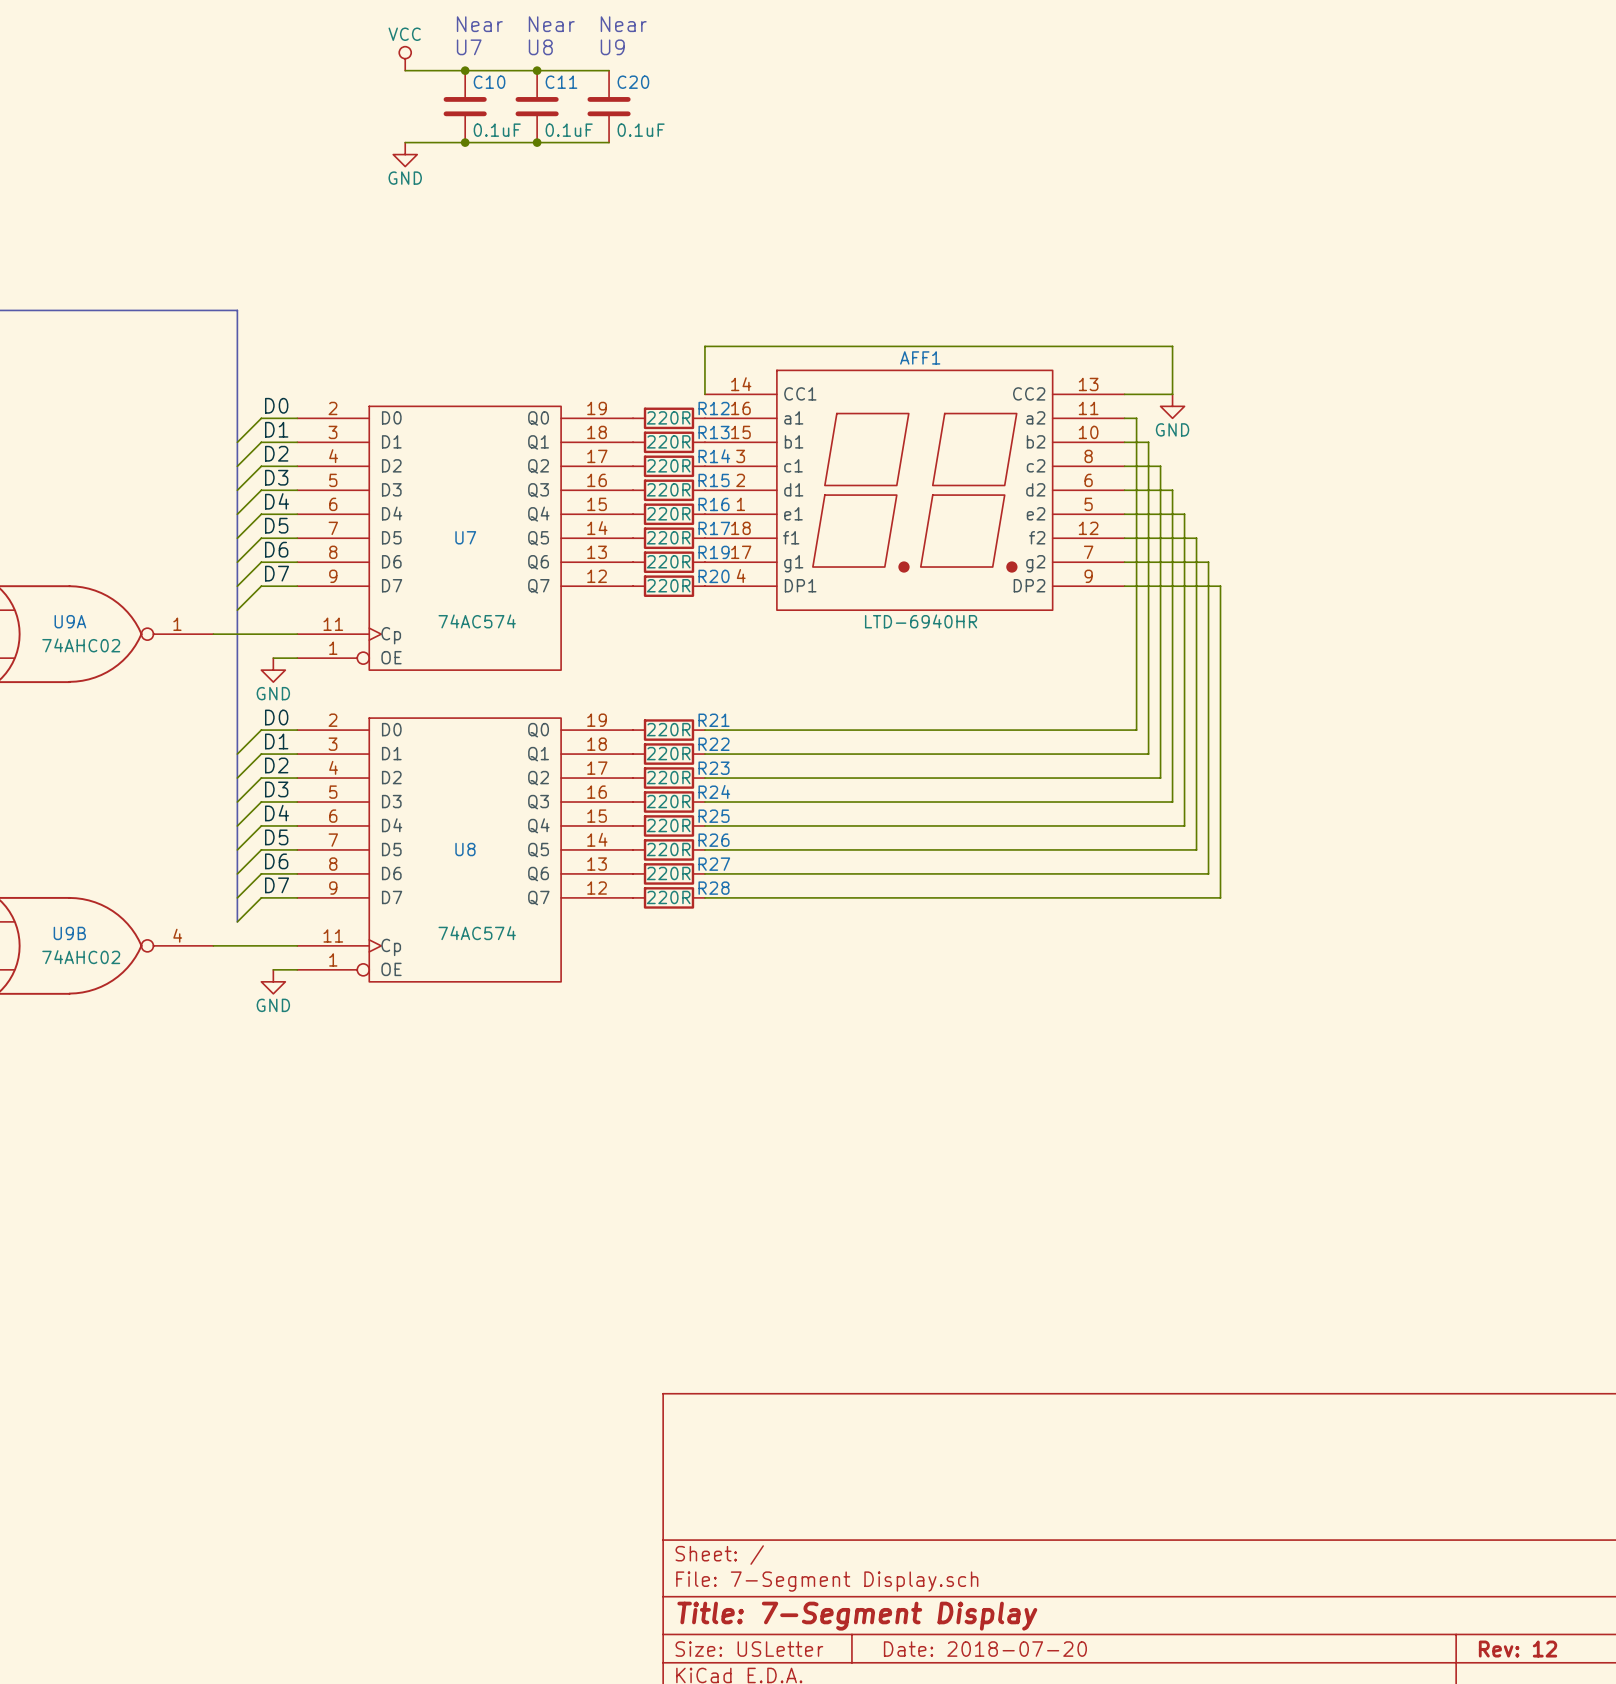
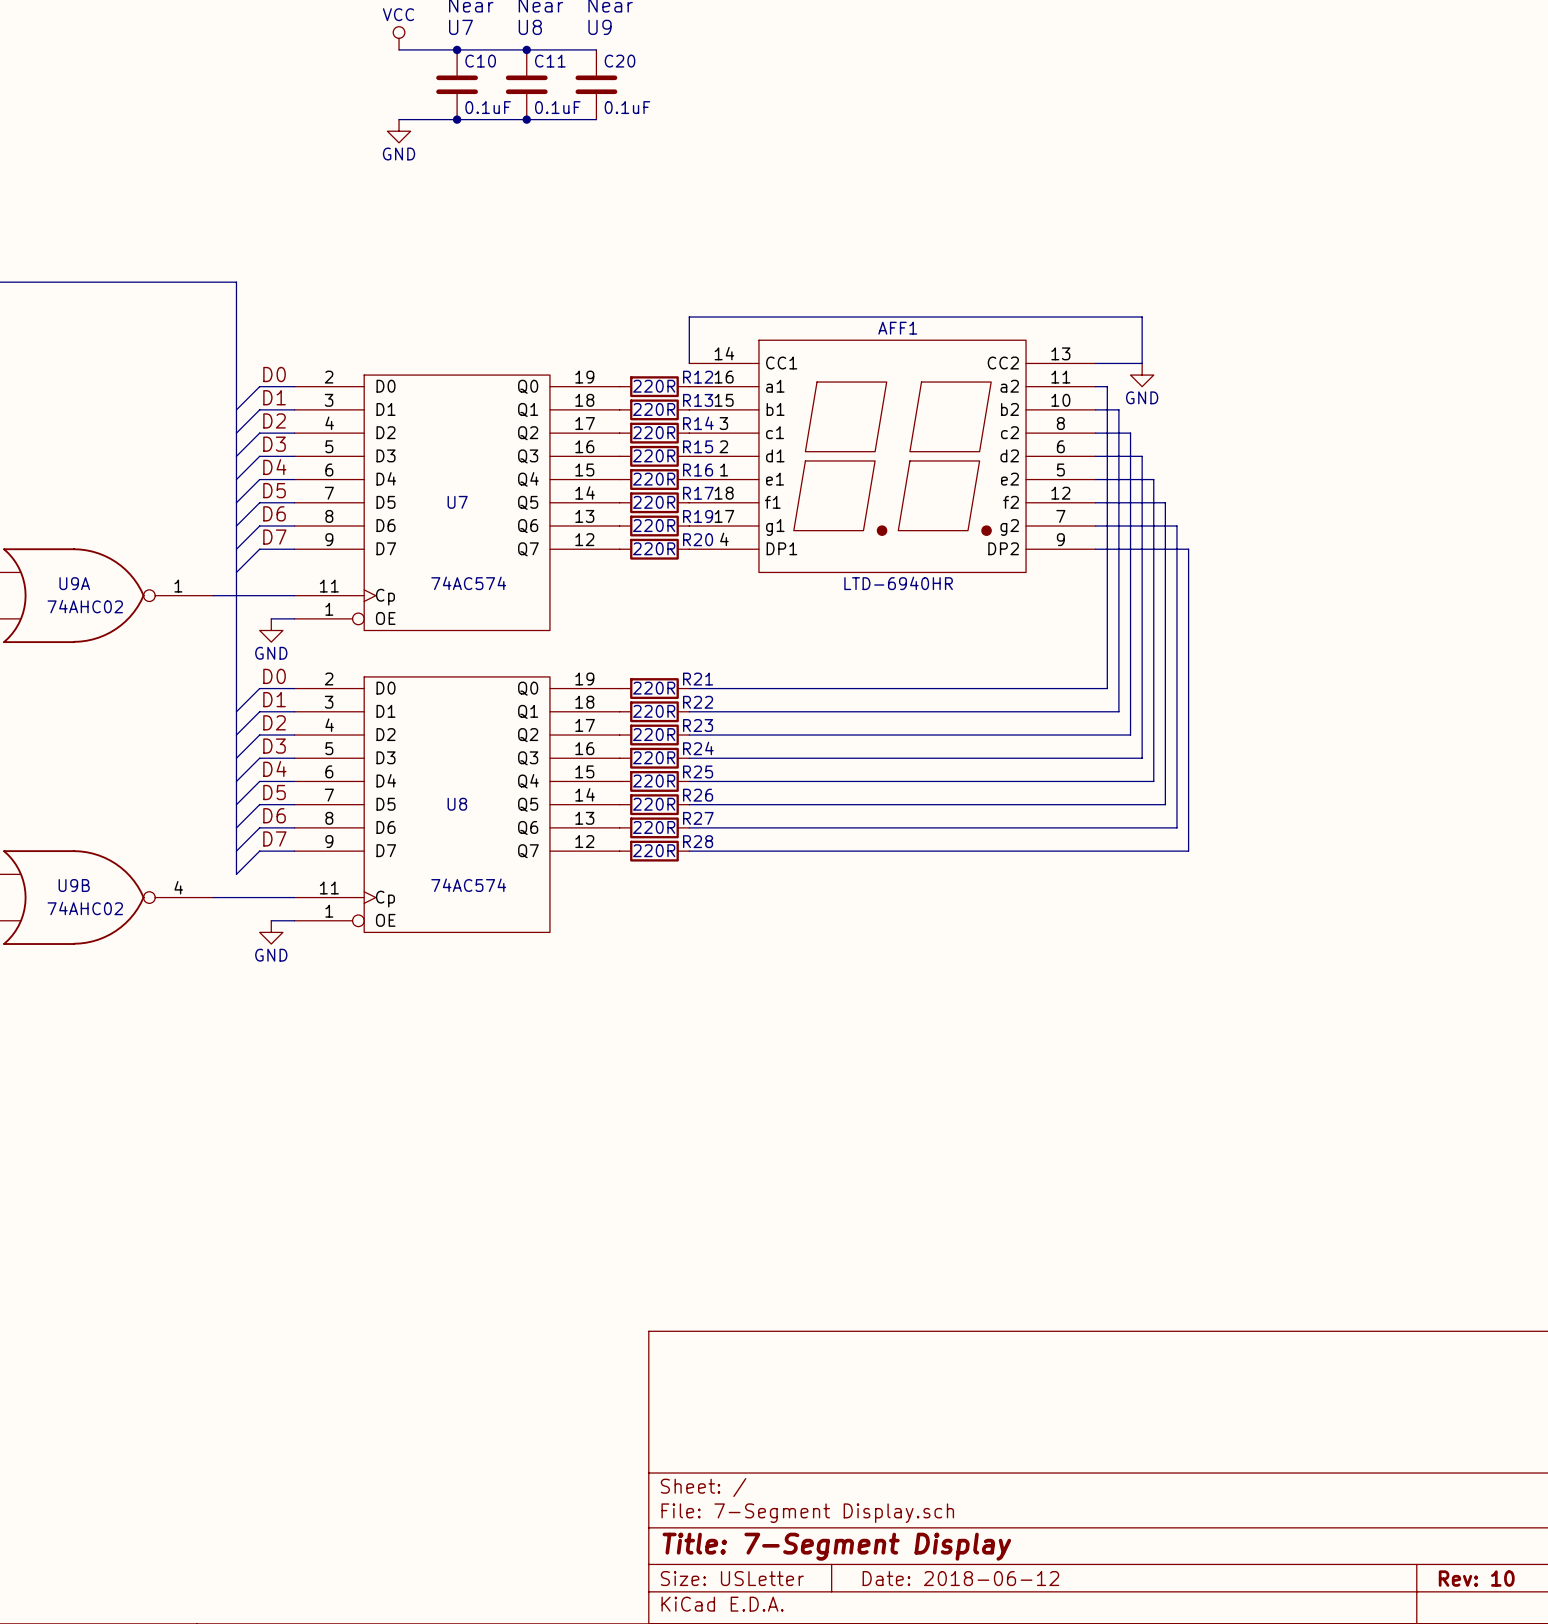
title block: Date: 2018-07-20 (985, 1649) -> Date: 2018-06-12 (960, 1578)
title block: Rev: 12 (1518, 1649) -> Rev: 10 (1476, 1578)

